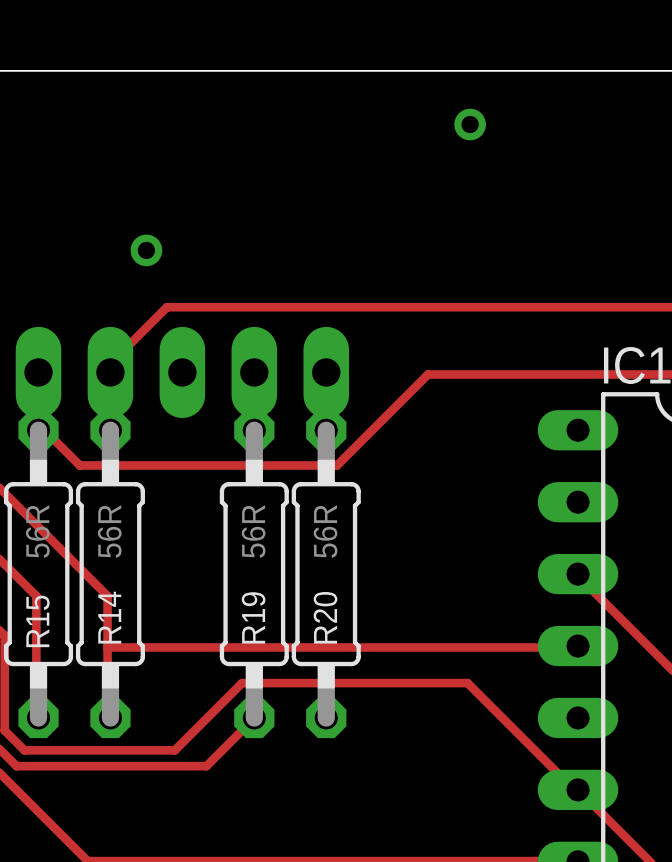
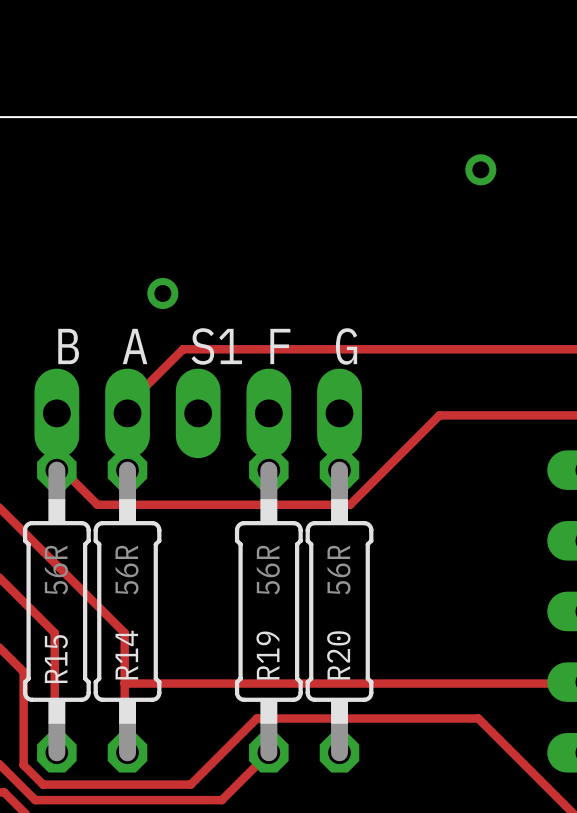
text: none -> B (68, 346)
text: none -> A (135, 346)
text: none -> S1 (216, 346)
text: none -> F (280, 346)
text: none -> G (346, 346)

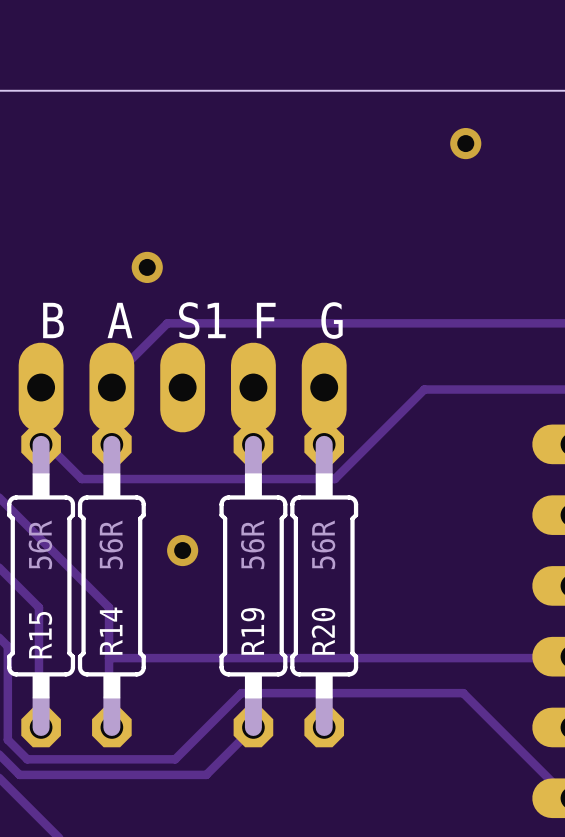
via: none -> (182, 550)

